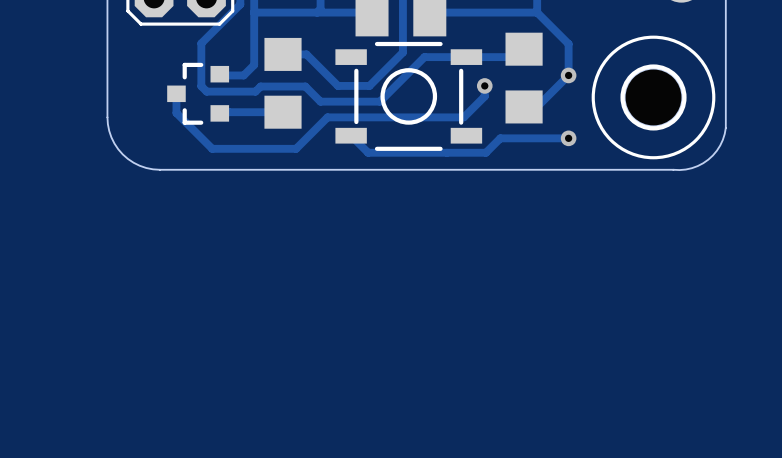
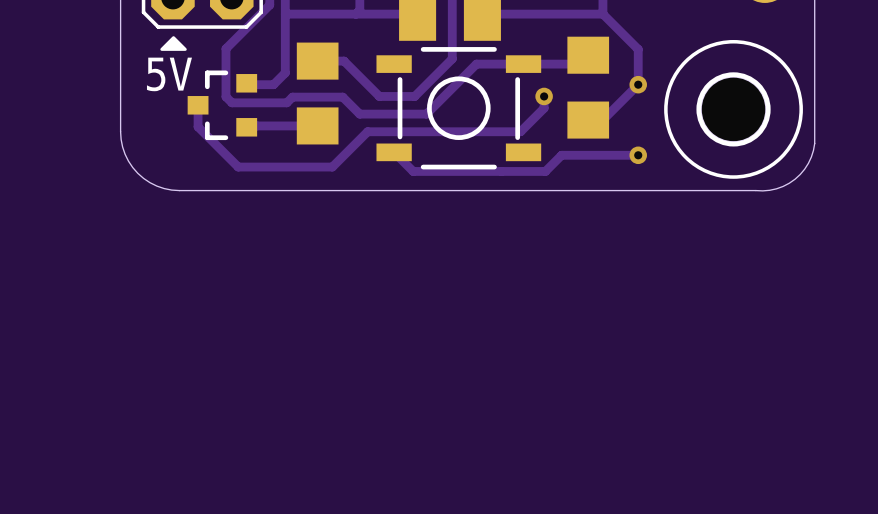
drawing: none -> [160, 36, 187, 51]
text: none -> 5V (169, 74)

